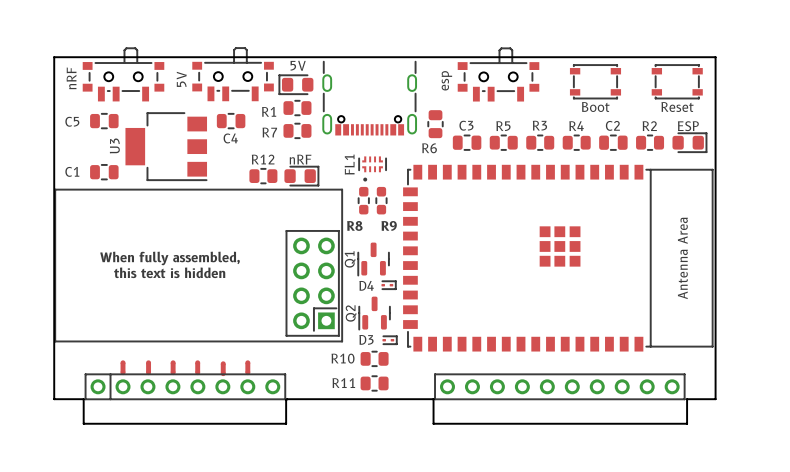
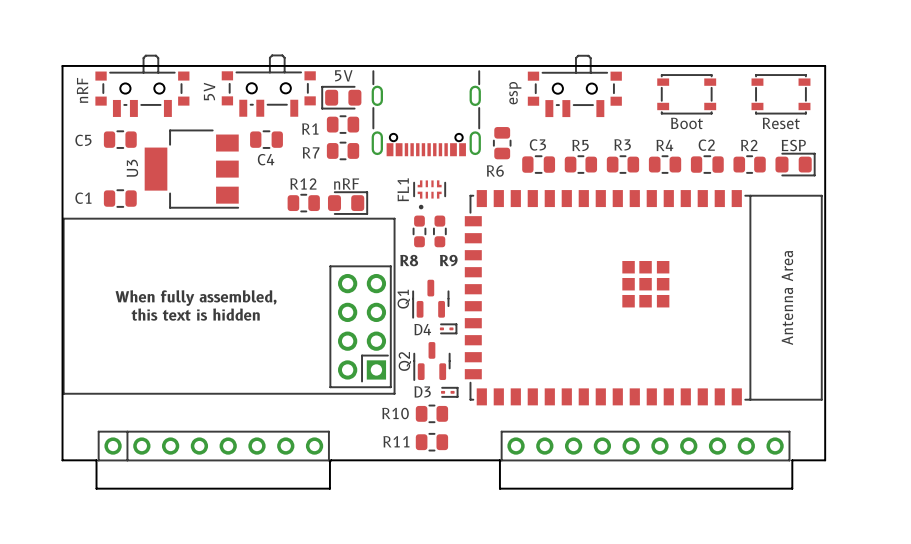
part: (123, 367) -> none
part: (148, 367) -> none
part: (173, 367) -> none
part: (197, 367) -> none
part: (247, 367) -> none
part: (223, 368) -> none

